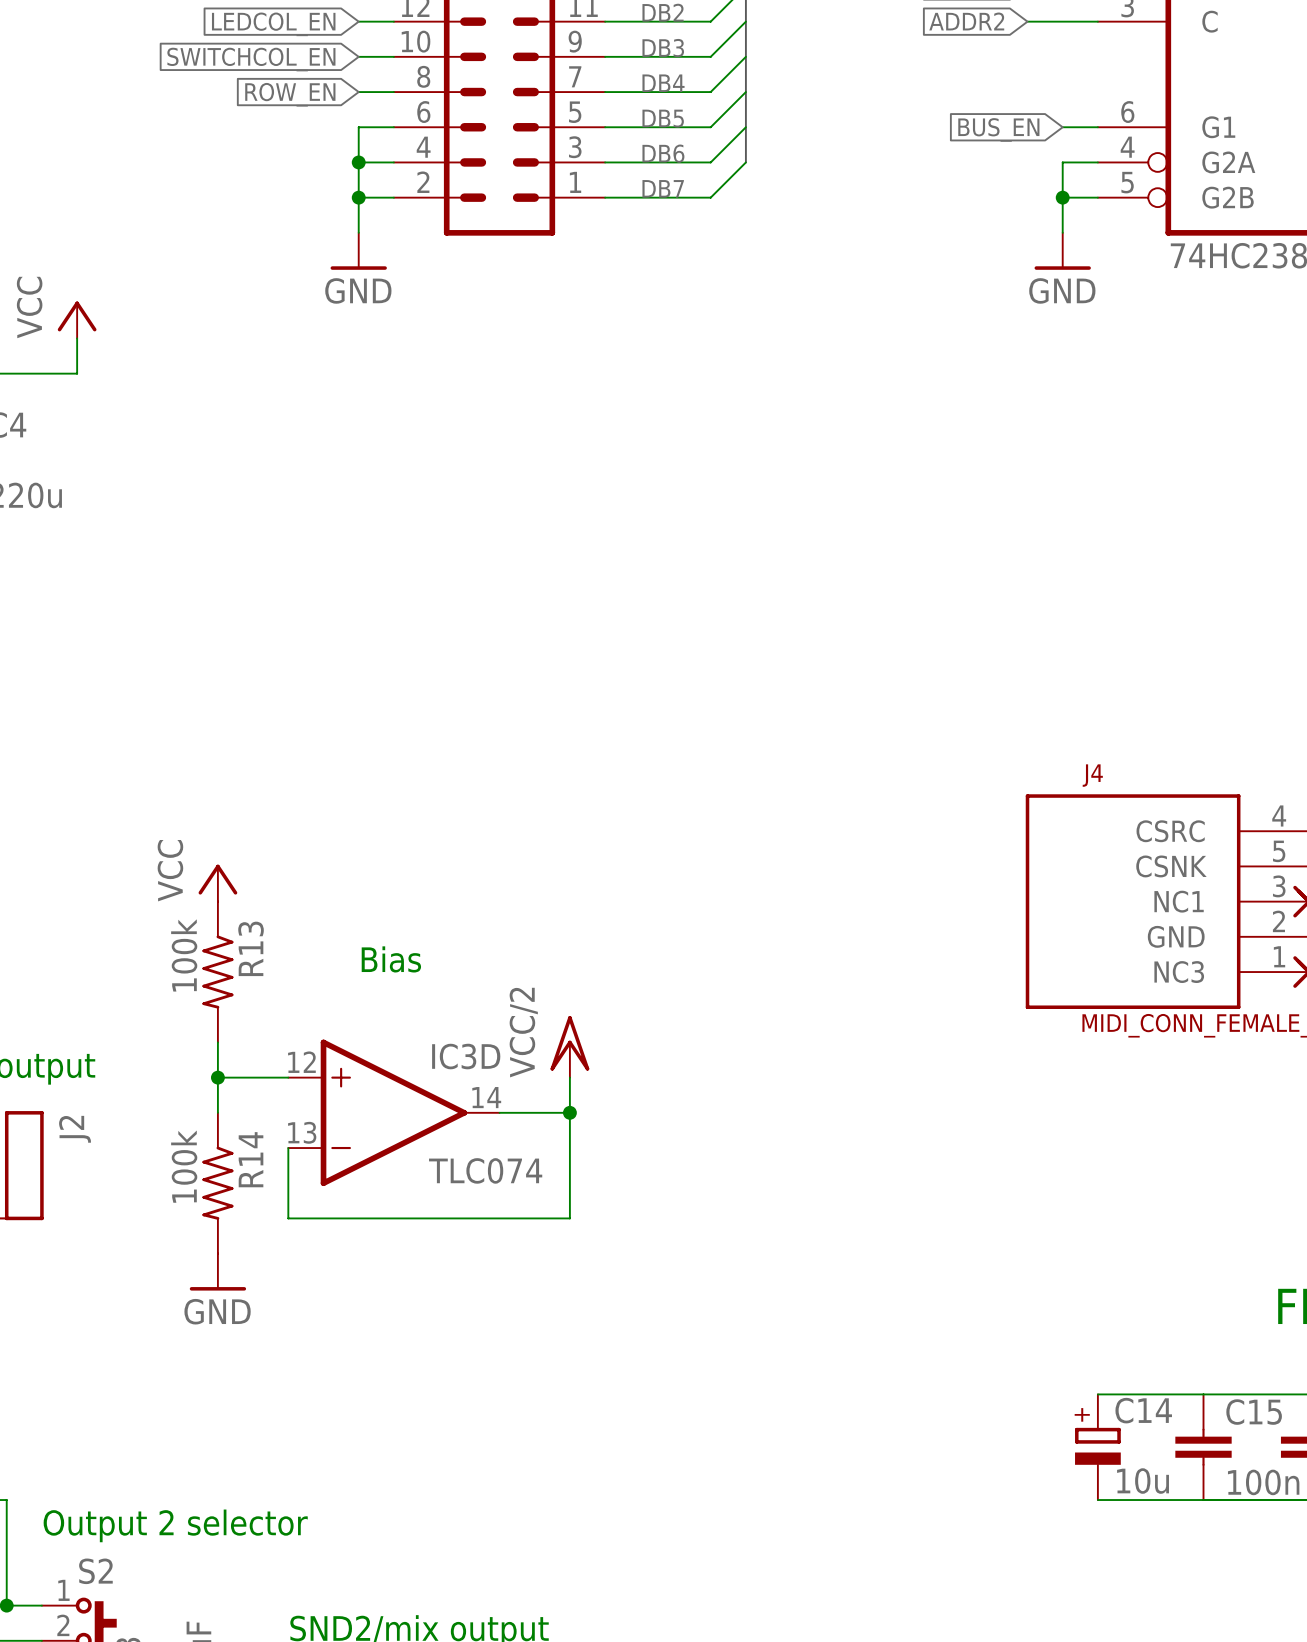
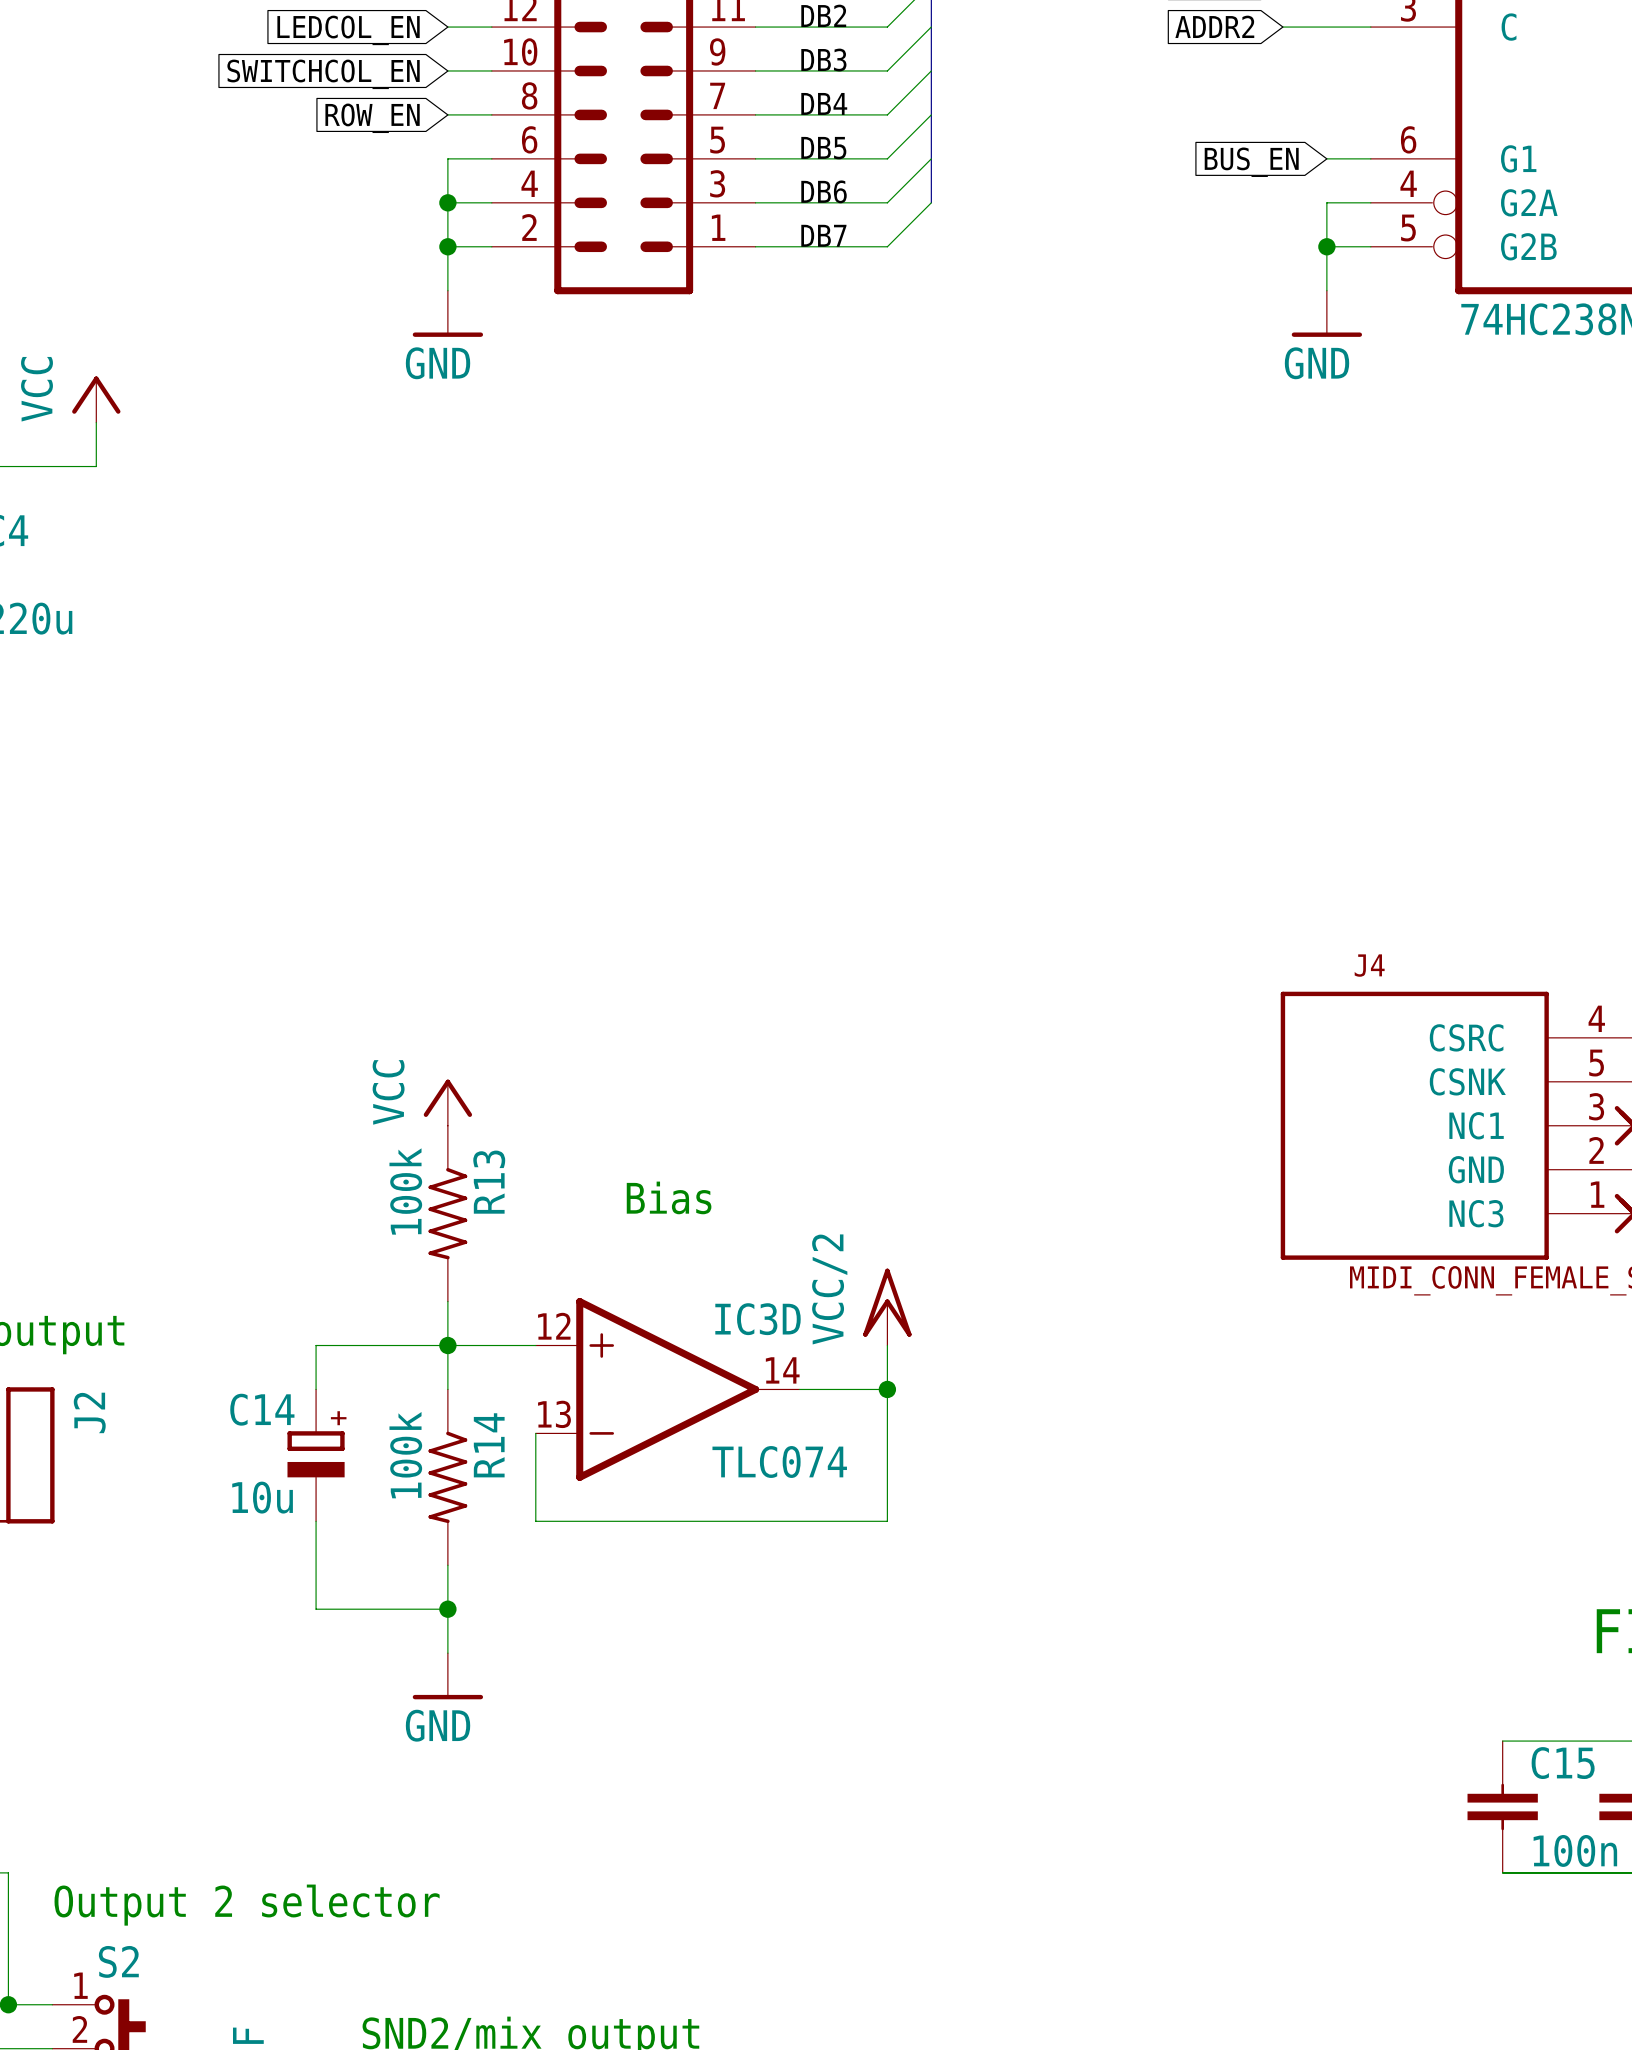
power symbol position: VCC (217, 883) -> VCC (447, 1102)
text position: Bias (391, 959) -> Bias (669, 1197)
R13 position: (217, 972) -> (447, 1213)
wire: (217, 1042) (217, 1112) -> (447, 1301) (447, 1389)
power symbol position: VCC/2 (569, 1046) -> VCC/2 (887, 1307)
wire: (217, 1077) (253, 1077) -> (316, 1389) (316, 1345)
junction: (217, 1077) -> none
wire: none -> (360, 1345) (535, 1345)
junction: none -> (447, 1345)
wire: (569, 1077) (569, 1218) -> (887, 1345) (887, 1521) (711, 1521)
IC3D position: (393, 1112) -> (667, 1389)
wire: (499, 1112) (569, 1112) -> (799, 1389) (887, 1389)
junction: (569, 1112) -> none
junction: none -> (887, 1389)
wire: (288, 1148) (288, 1218) (429, 1218) -> (535, 1433) (535, 1521)
R14 position: (217, 1183) -> (447, 1477)
wire: none -> (316, 1521) (316, 1609) (447, 1609)
wire: none -> (447, 1565) (447, 1653)
power symbol position: GND (217, 1272) -> GND (447, 1676)
junction: none -> (447, 1609)
wire: (1097, 1394) (1203, 1394) -> none
C14 name position: C14 (1143, 1410) -> C14 (262, 1409)
C14 text position: + (1082, 1414) -> + (338, 1418)
C14 position: (1097, 1447) -> (316, 1455)
C14 value position: 10u (1143, 1481) -> 10u (262, 1497)
wire: (1097, 1500) (1203, 1500) -> none

